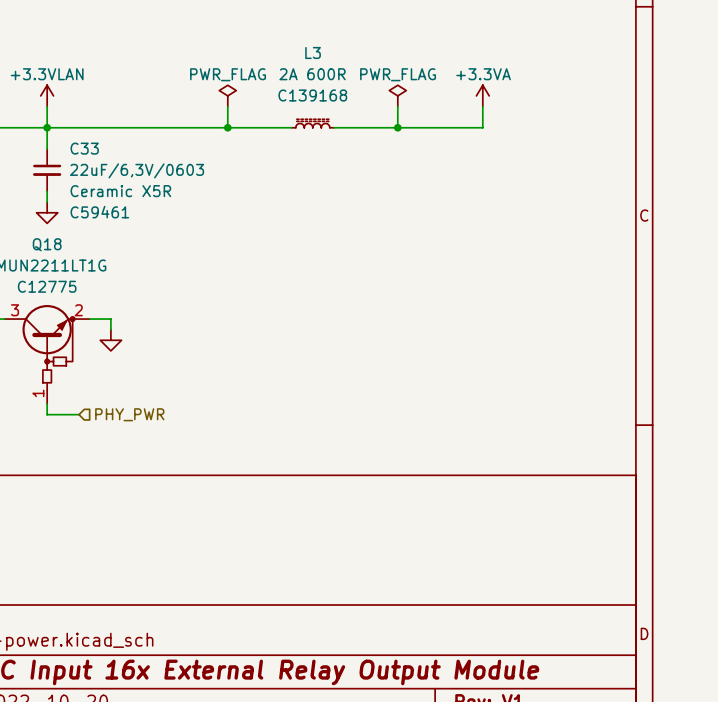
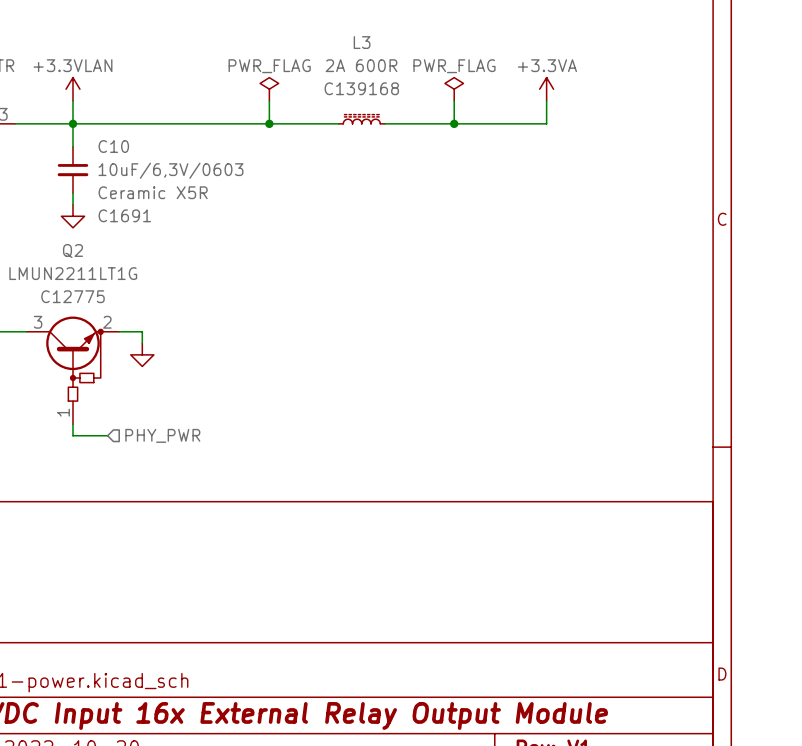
C33 name: C33 (84, 148) -> C10 (113, 146)
C33 value: 22uF/6,3V/0603 (137, 170) -> 10uF/6,3V/0603 (171, 170)
C33 text: C59461 (99, 212) -> C1691 (124, 215)
Q18 name: Q18 (47, 244) -> Q2 (72, 251)

